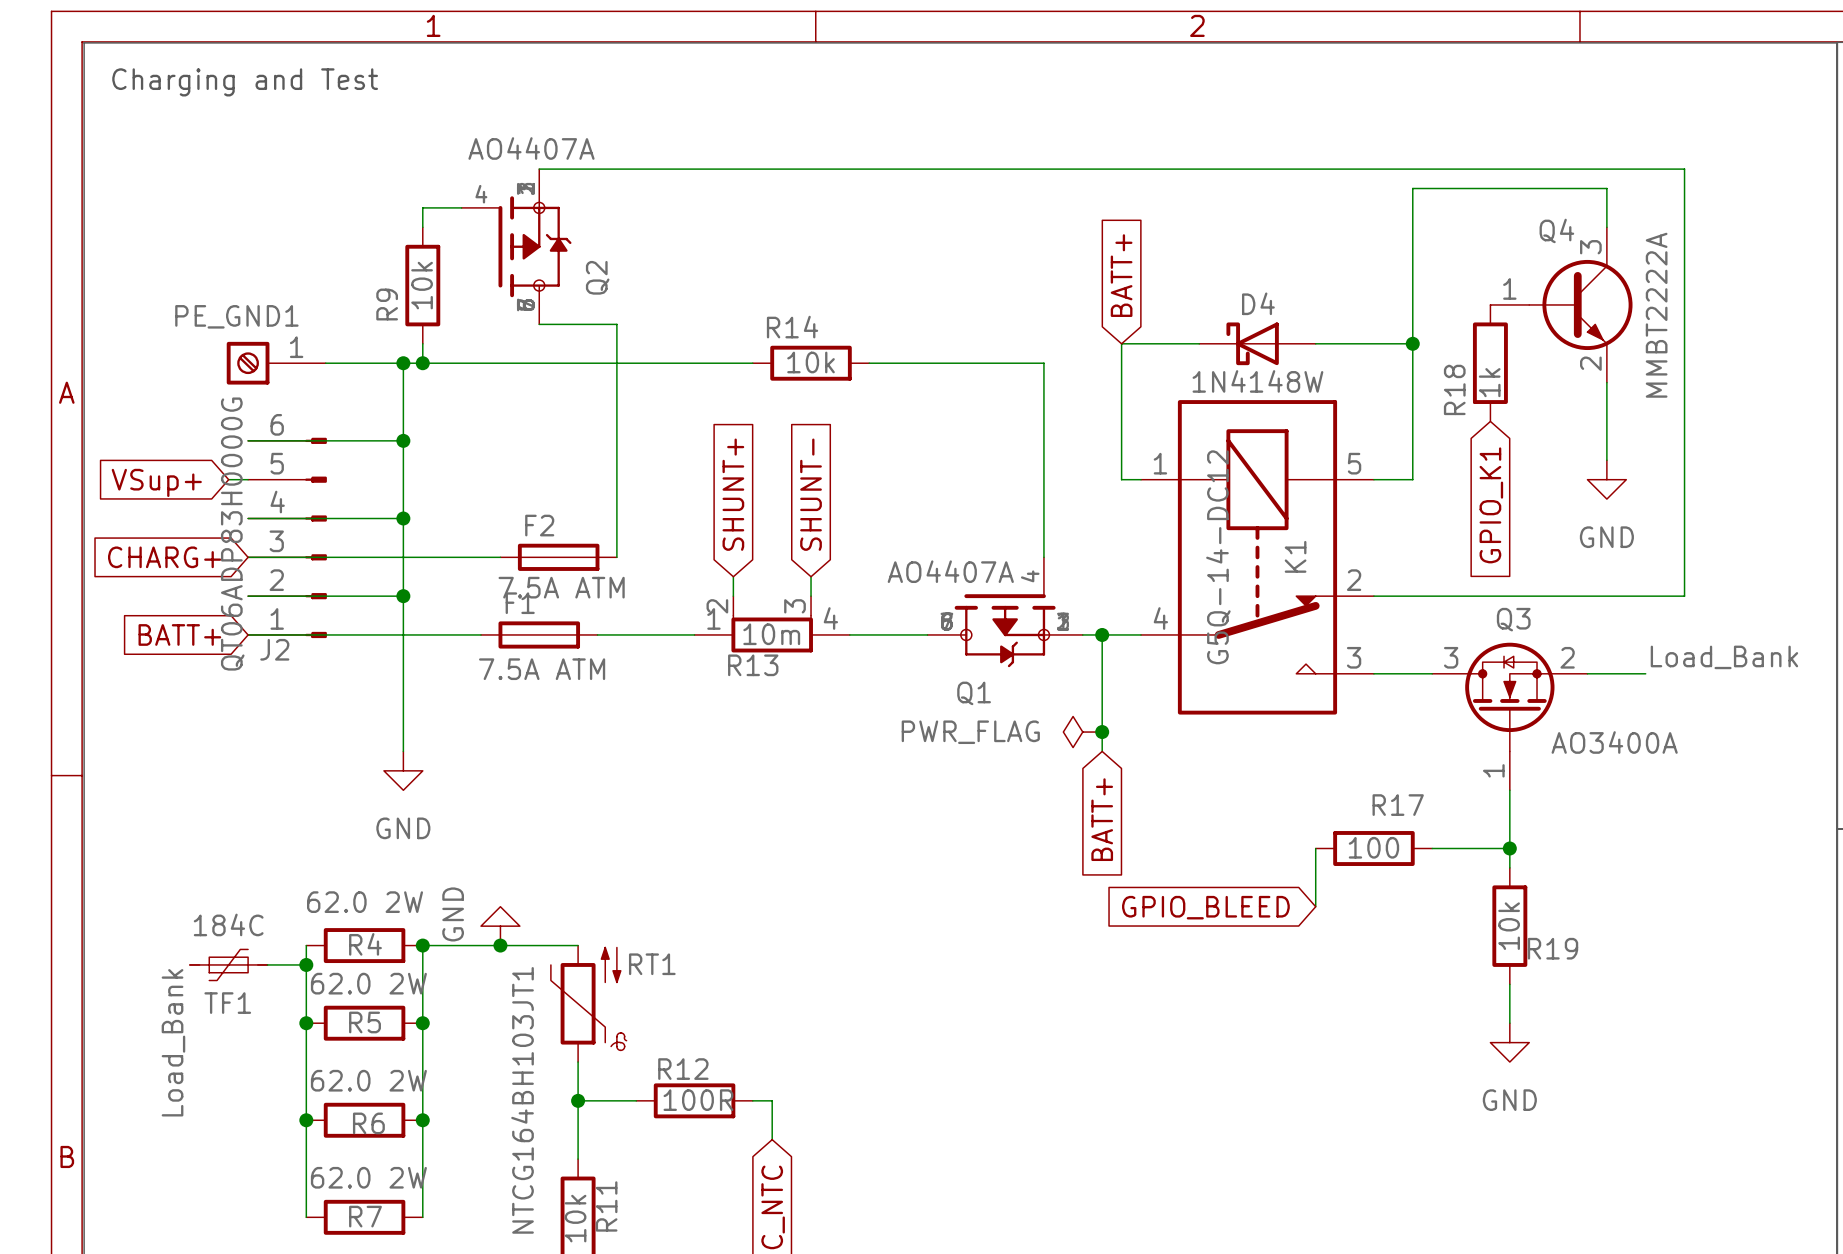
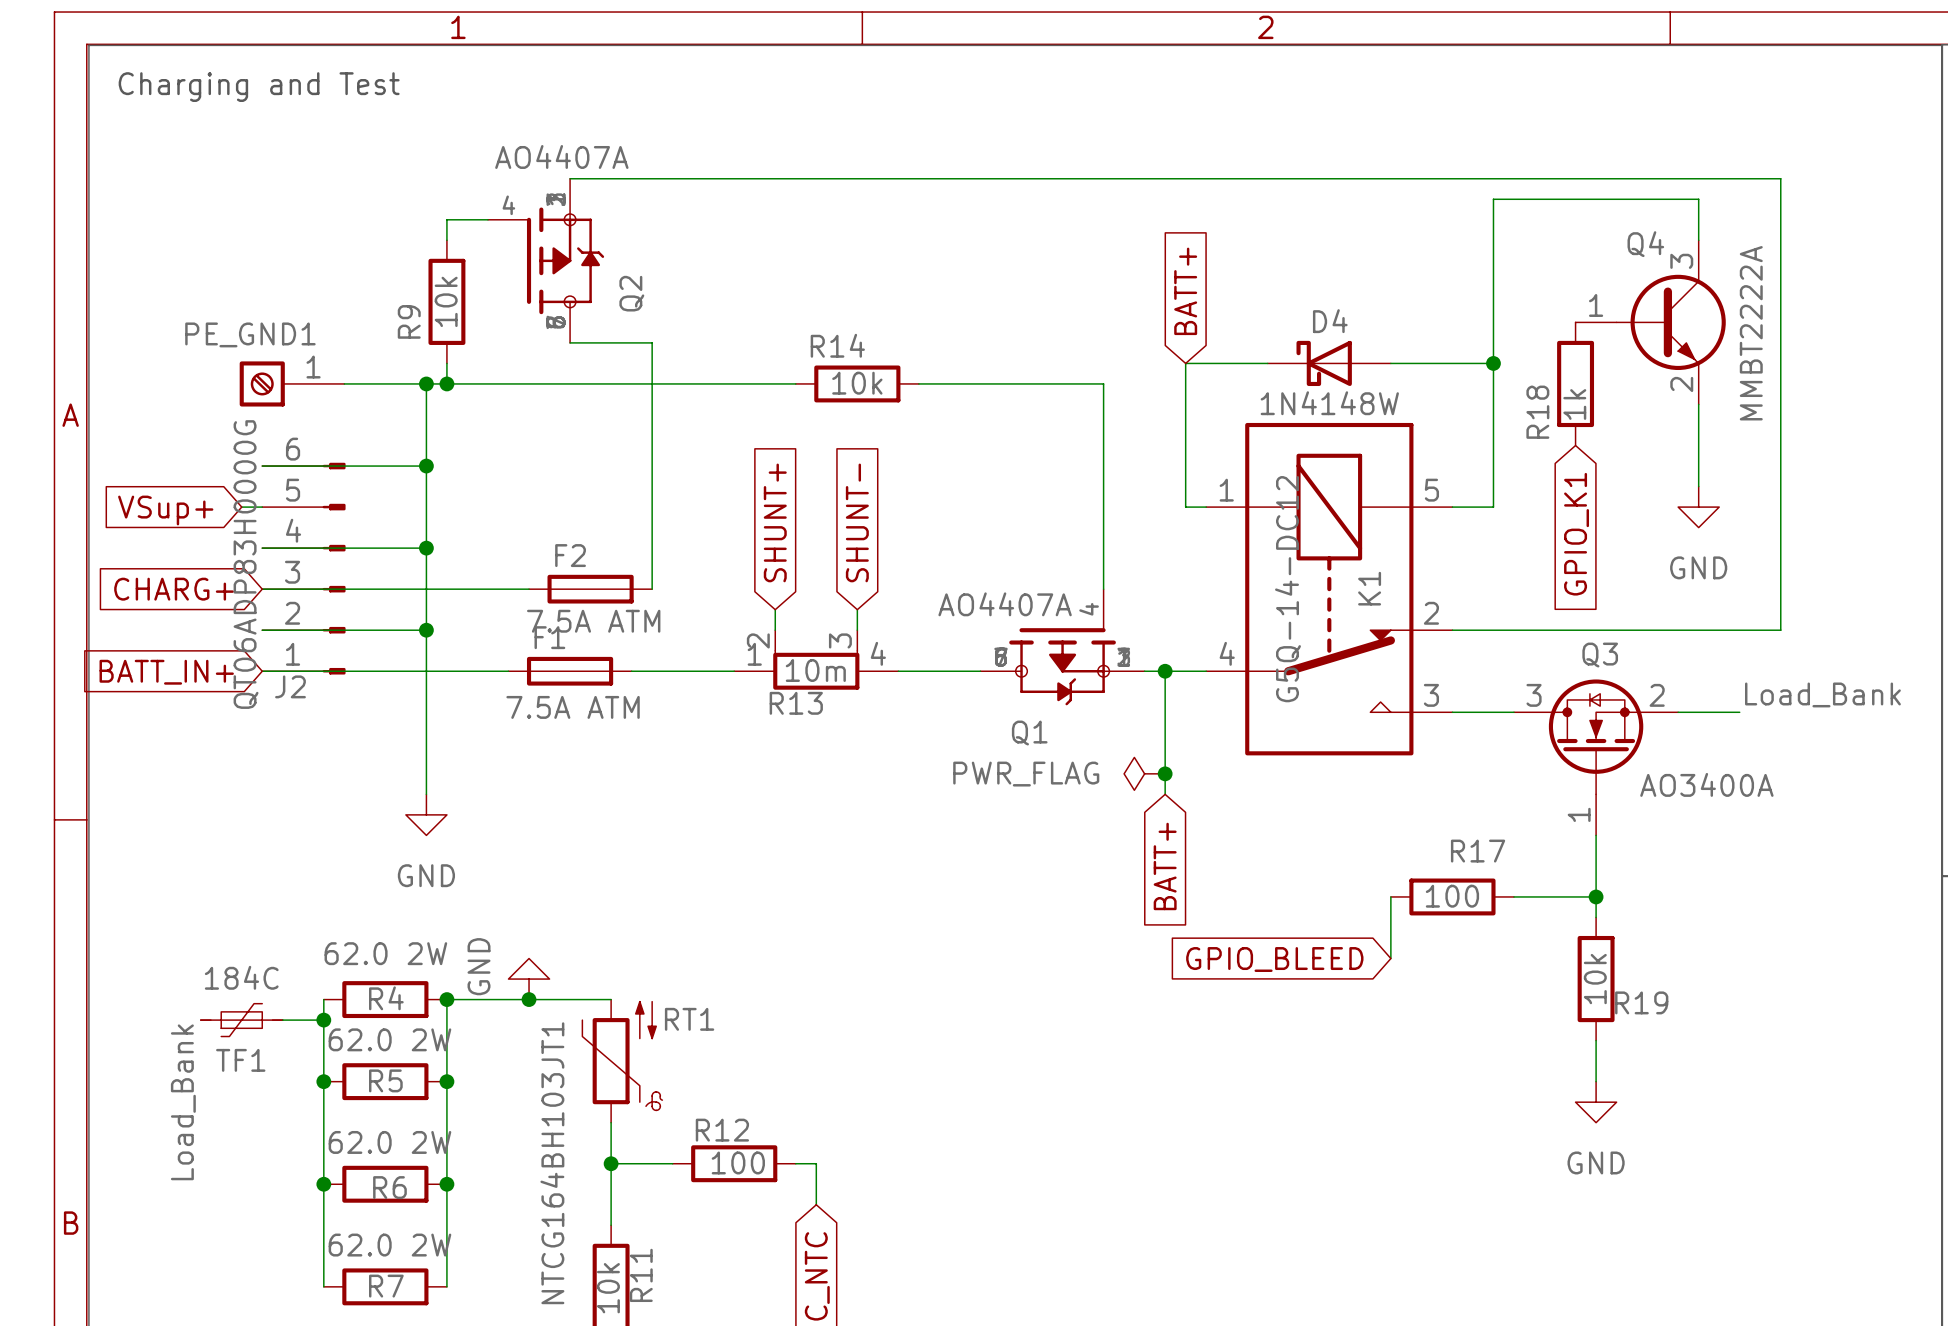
global label: BATT+ (179, 634) -> BATT_IN+ (166, 672)
R12 value: 100R (698, 1100) -> 100 (738, 1162)

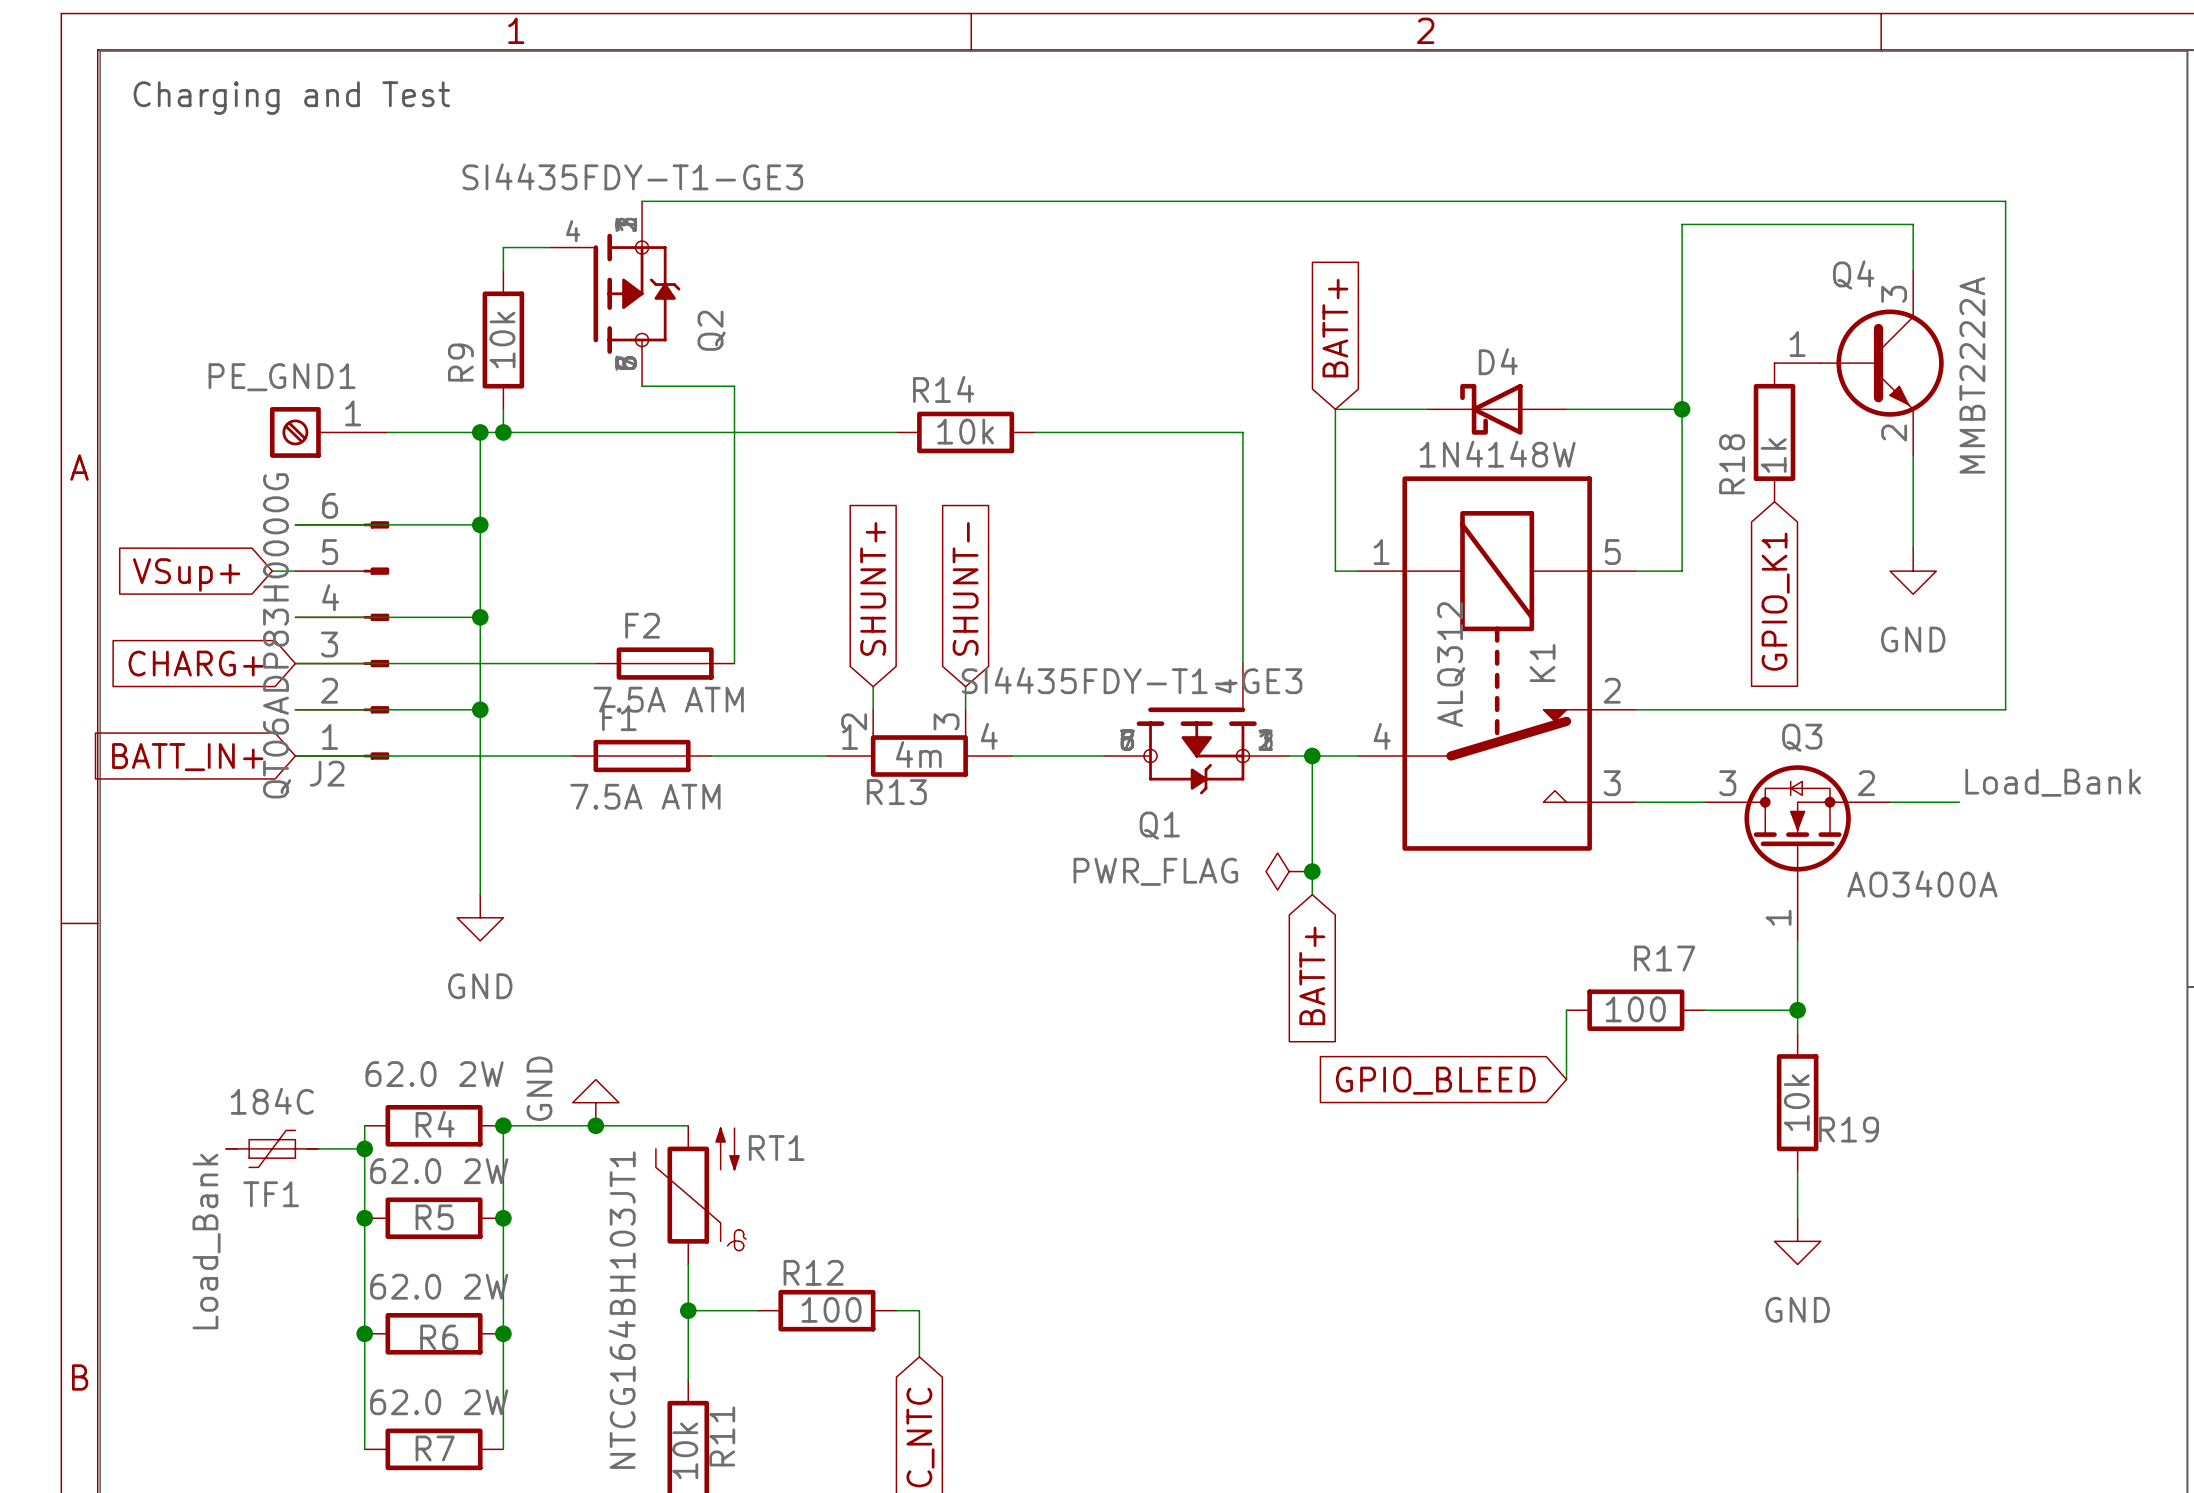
Q2 value: AO4407A (561, 156) -> SI4435FDY-T1-GE3 (632, 176)
K1 value: G5Q-14-DC12 (1288, 589) -> ALQ312 (1451, 664)
Q1 value: AO4407A (1005, 604) -> SI4435FDY-T1-GE3 (1132, 680)
R13 value: 10m (815, 670) -> 4m (918, 754)

